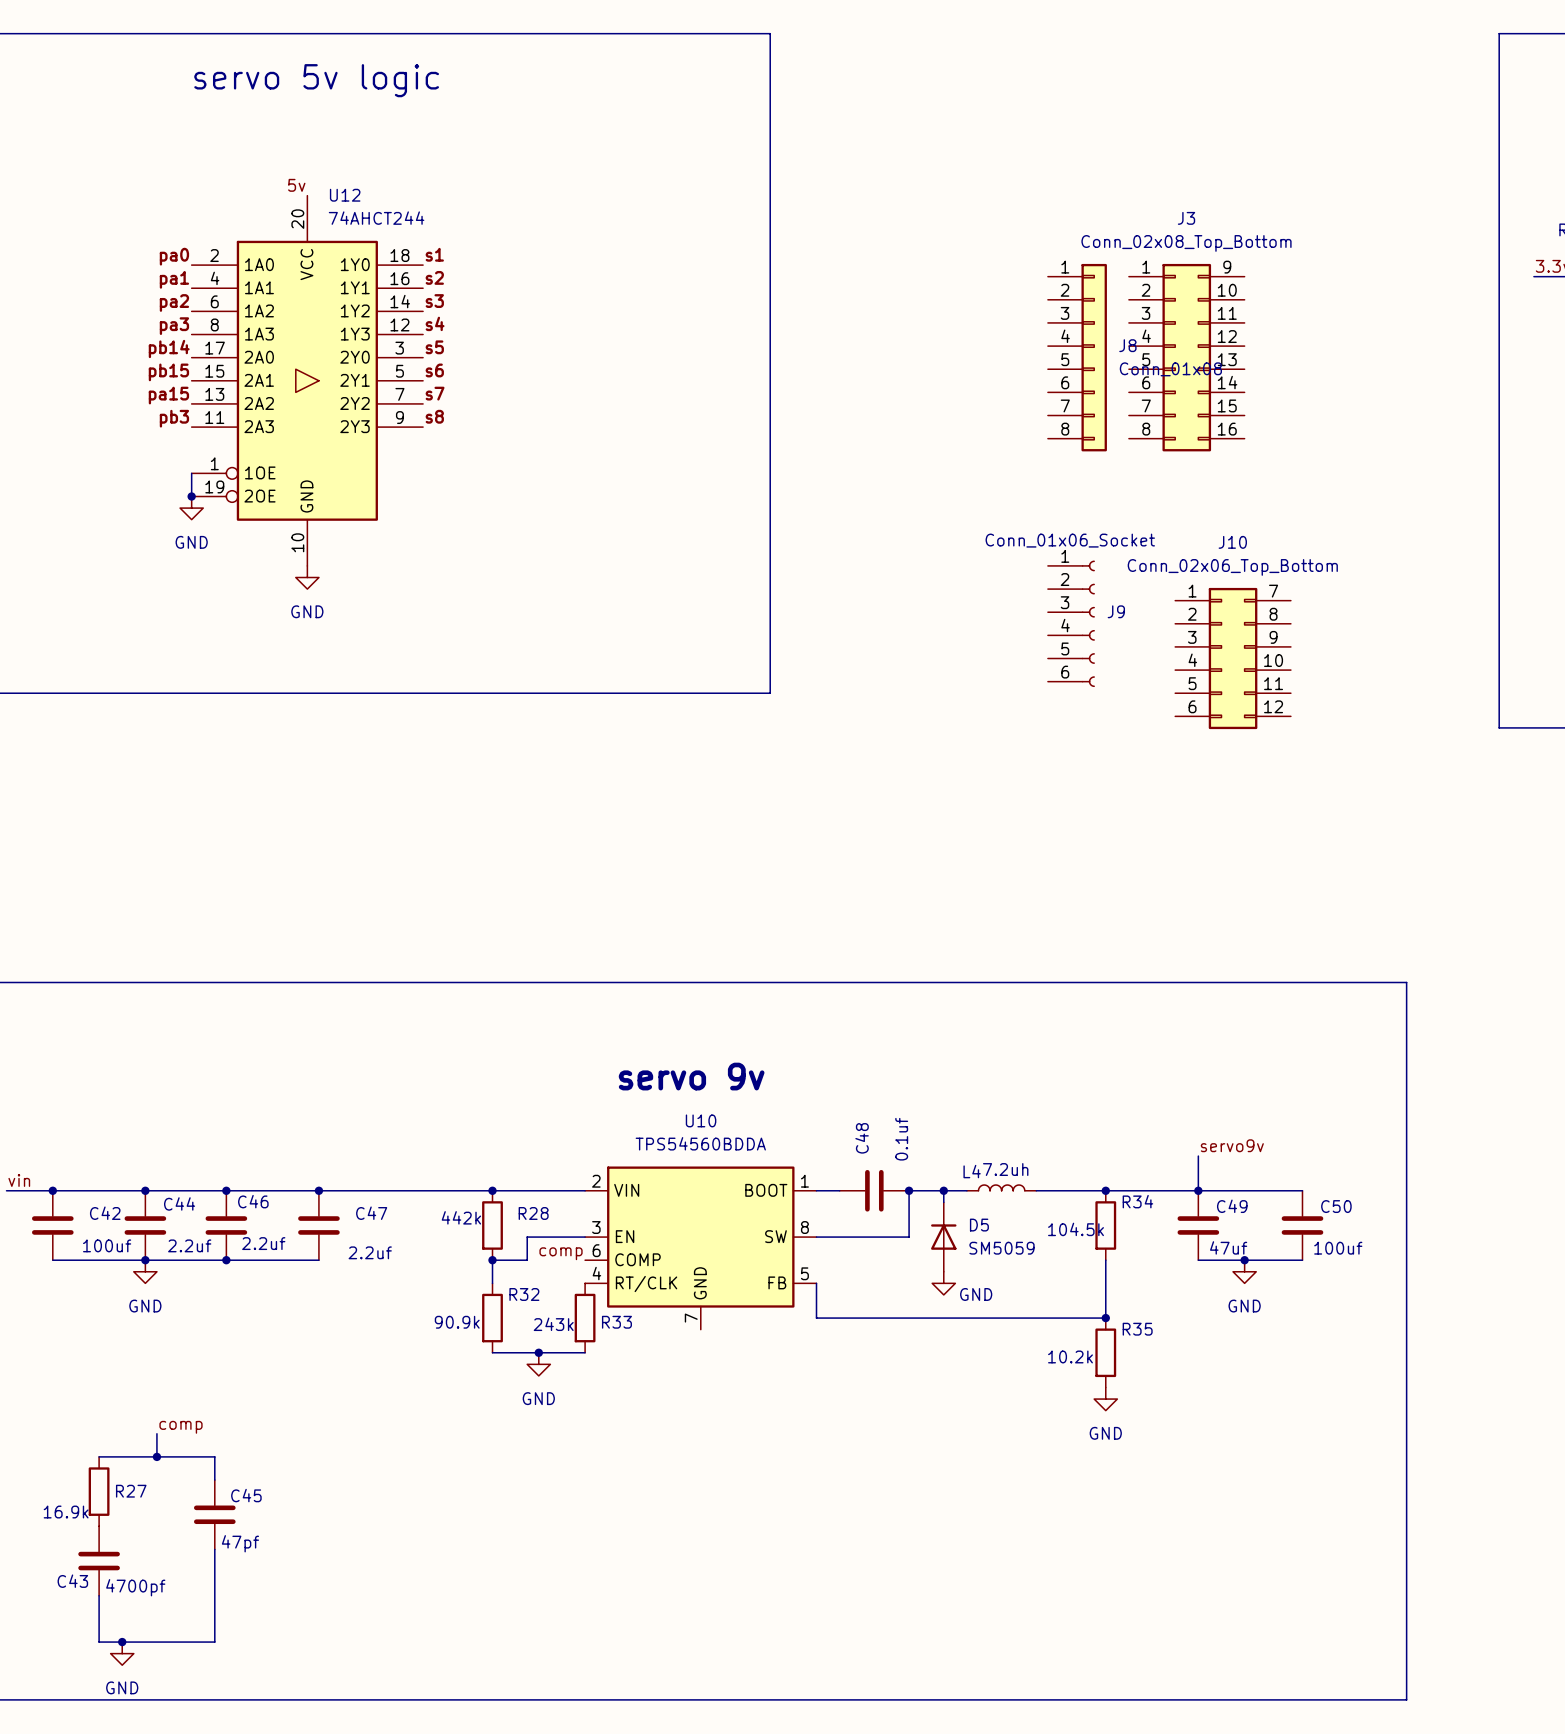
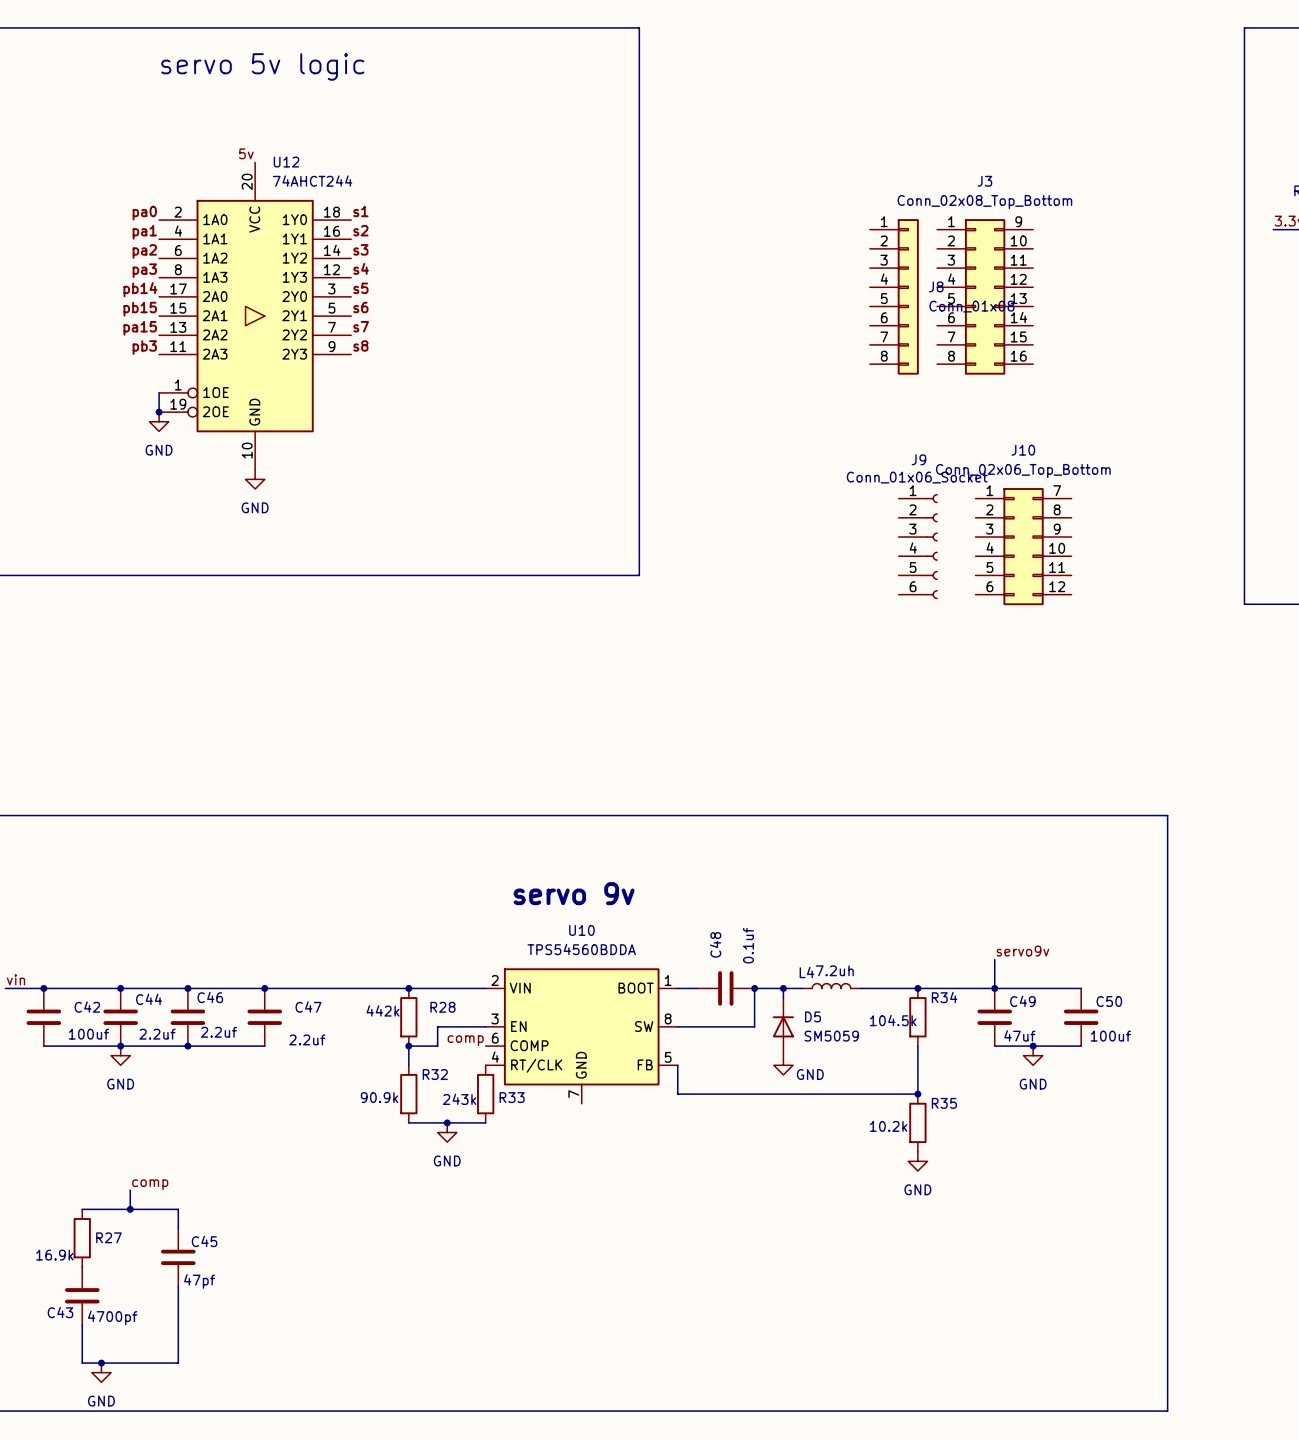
J9 name position: J9 (1116, 611) -> J9 (918, 459)
J9 position: (1071, 623) -> (918, 546)

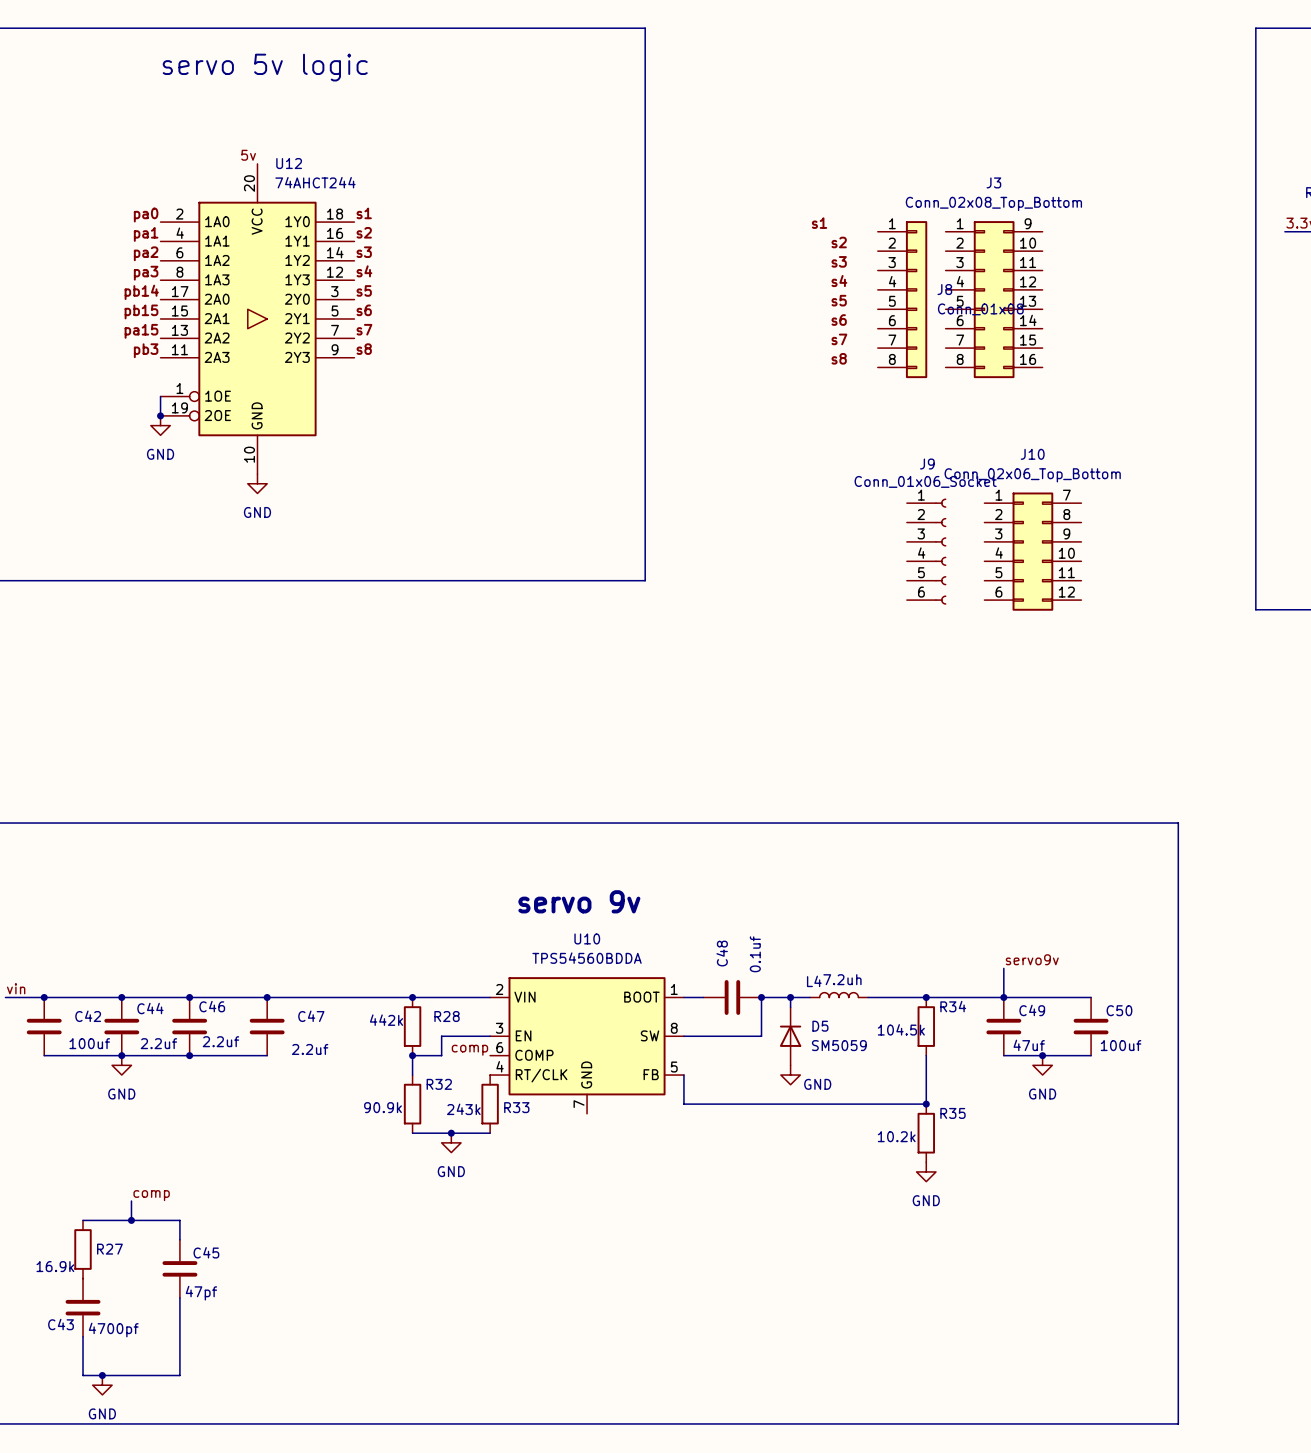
label: none -> s1 (819, 223)
label: none -> s2 (839, 242)
label: none -> s3 (839, 261)
label: none -> s4 (839, 281)
label: none -> s5 (839, 300)
label: none -> s6 (839, 320)
label: none -> s7 (839, 339)
label: none -> s8 (839, 358)

